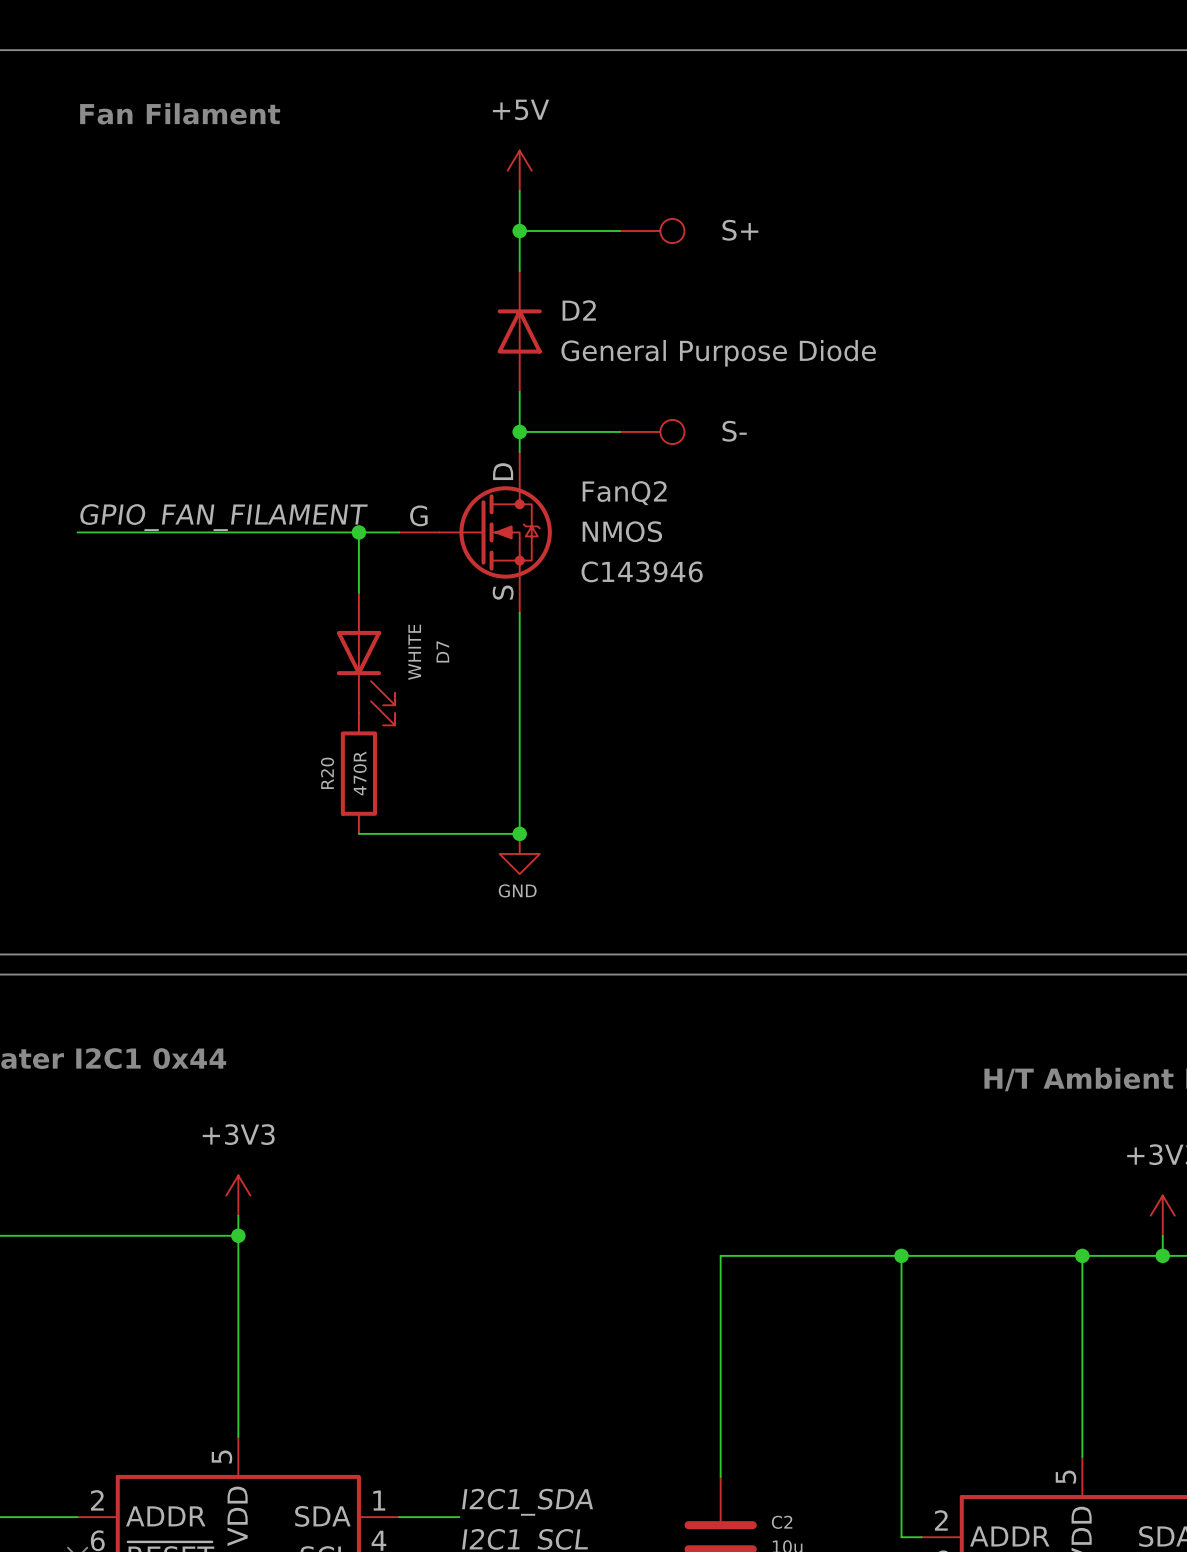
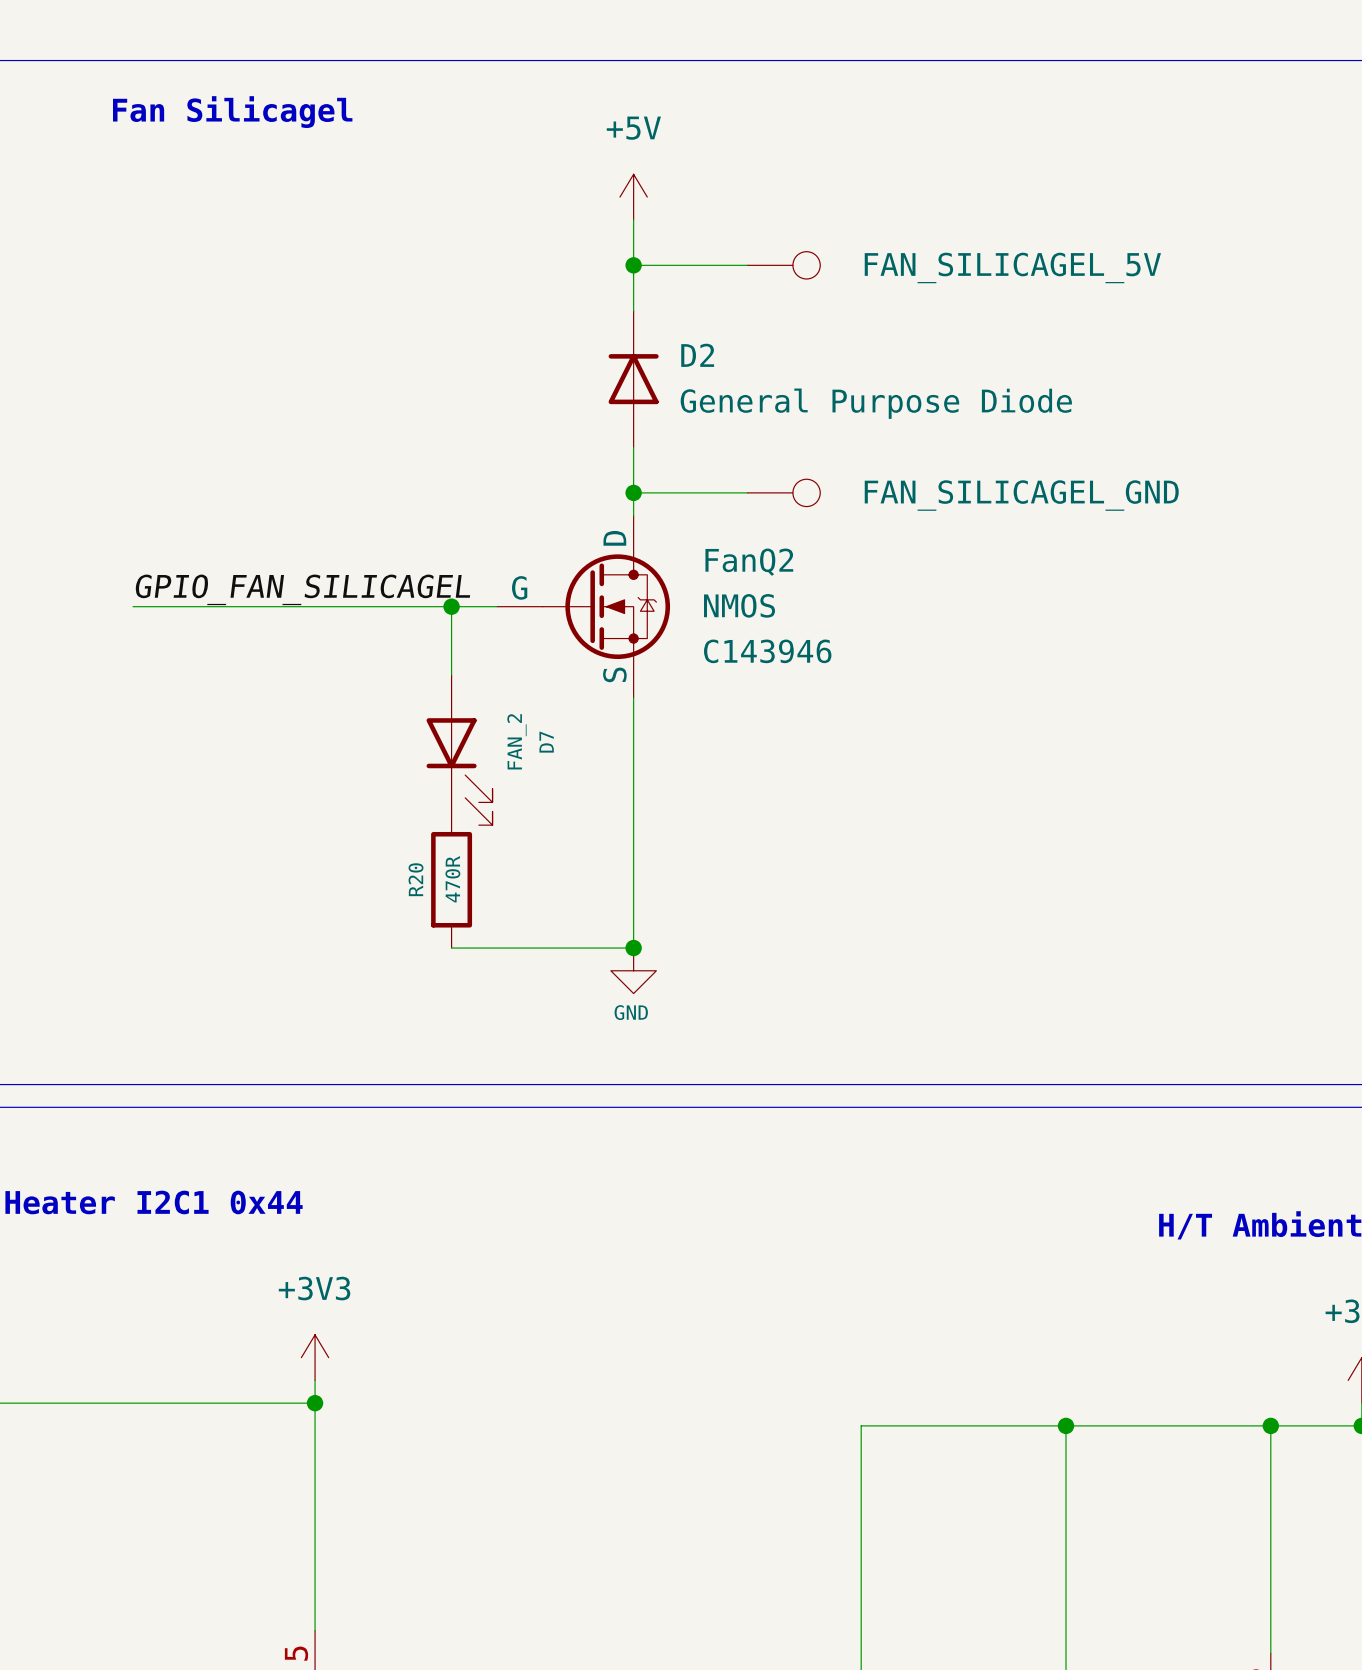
text: Fan Filament (180, 113) -> Fan Silicagel (232, 112)
part value: S+ (740, 230) -> FAN_SILICAGEL_5V (1012, 267)
part value: S- (734, 431) -> FAN_SILICAGEL_GND (1021, 495)
label: GPIO_FAN_FILAMENT (223, 517) -> GPIO_FAN_SILICAGEL (302, 589)
D7 value: WHITE (414, 652) -> FAN_2 (516, 741)

